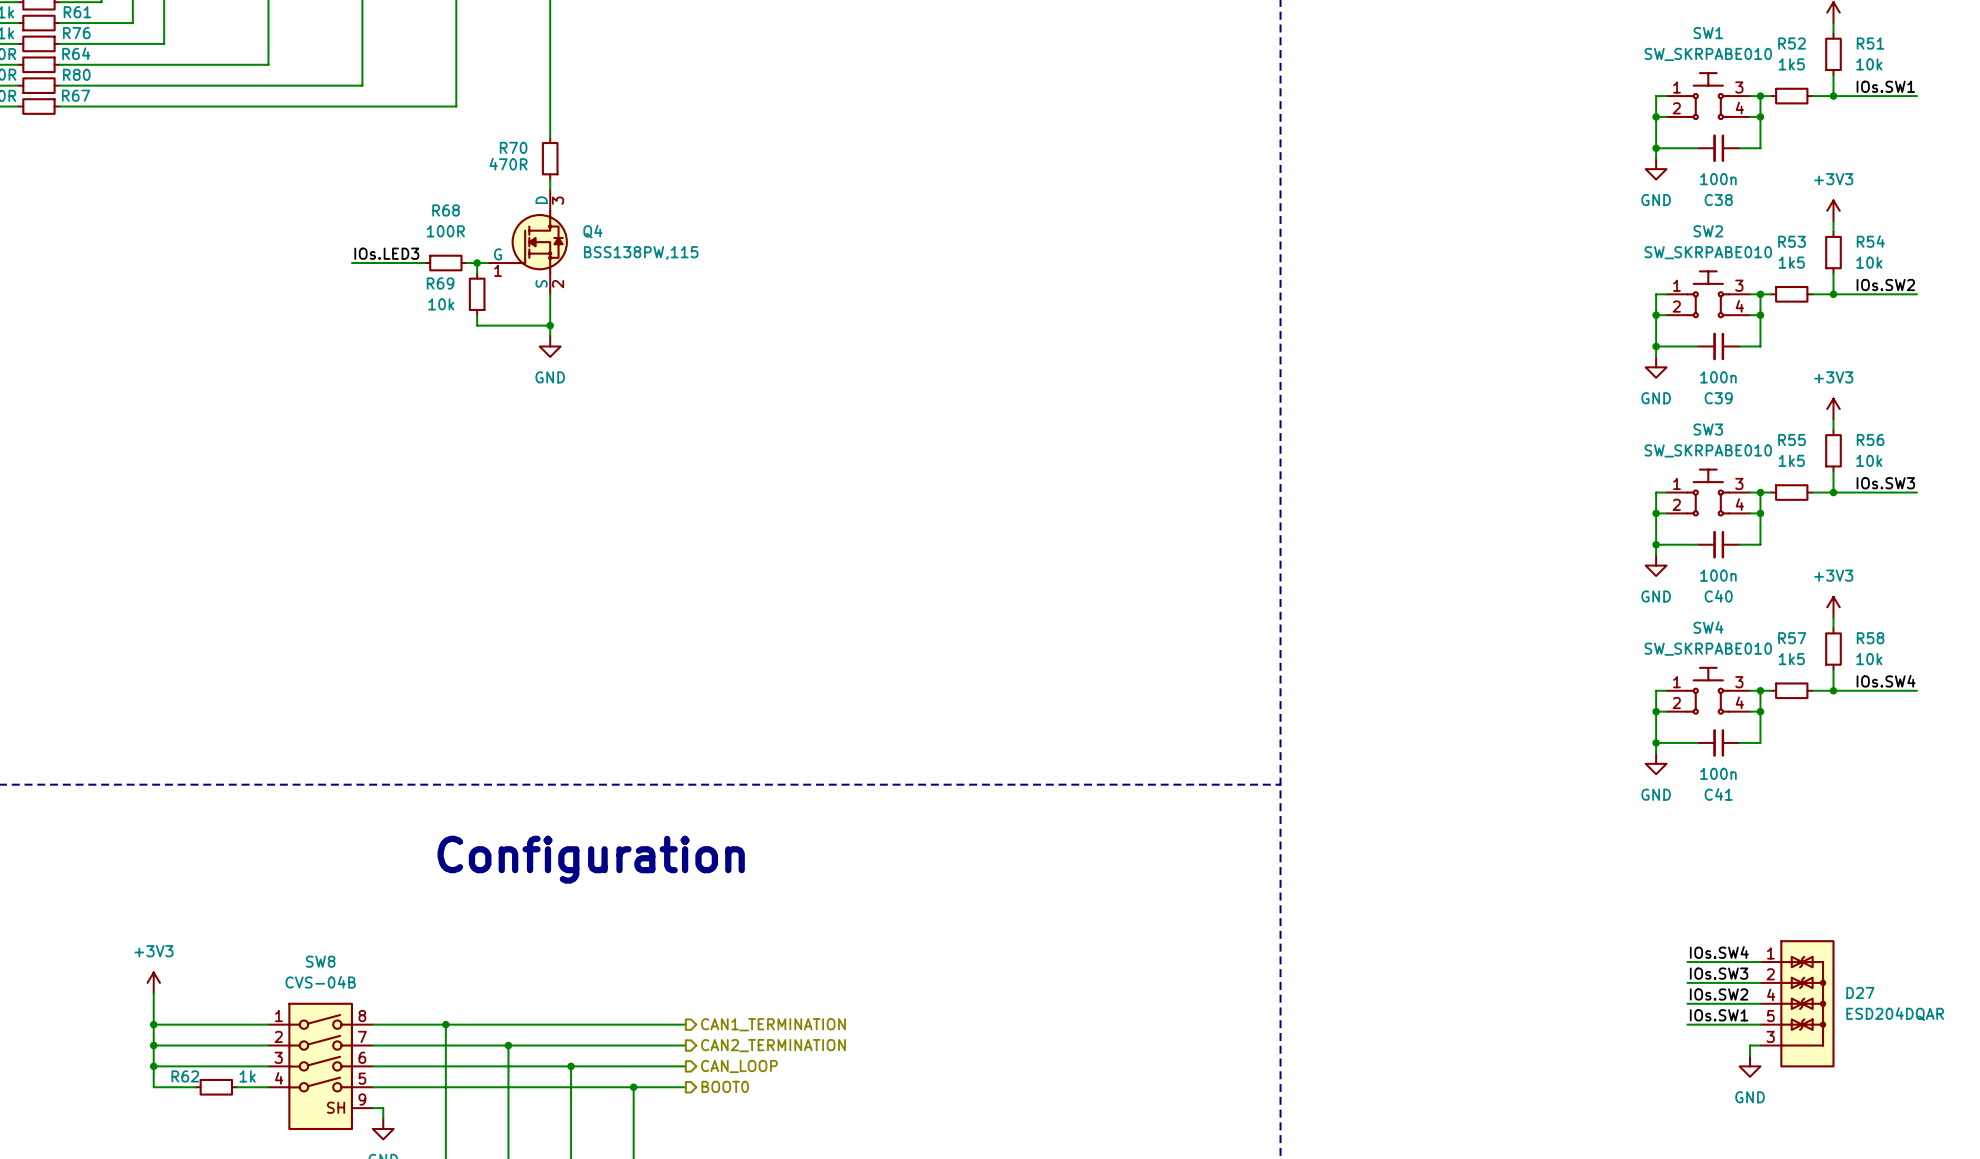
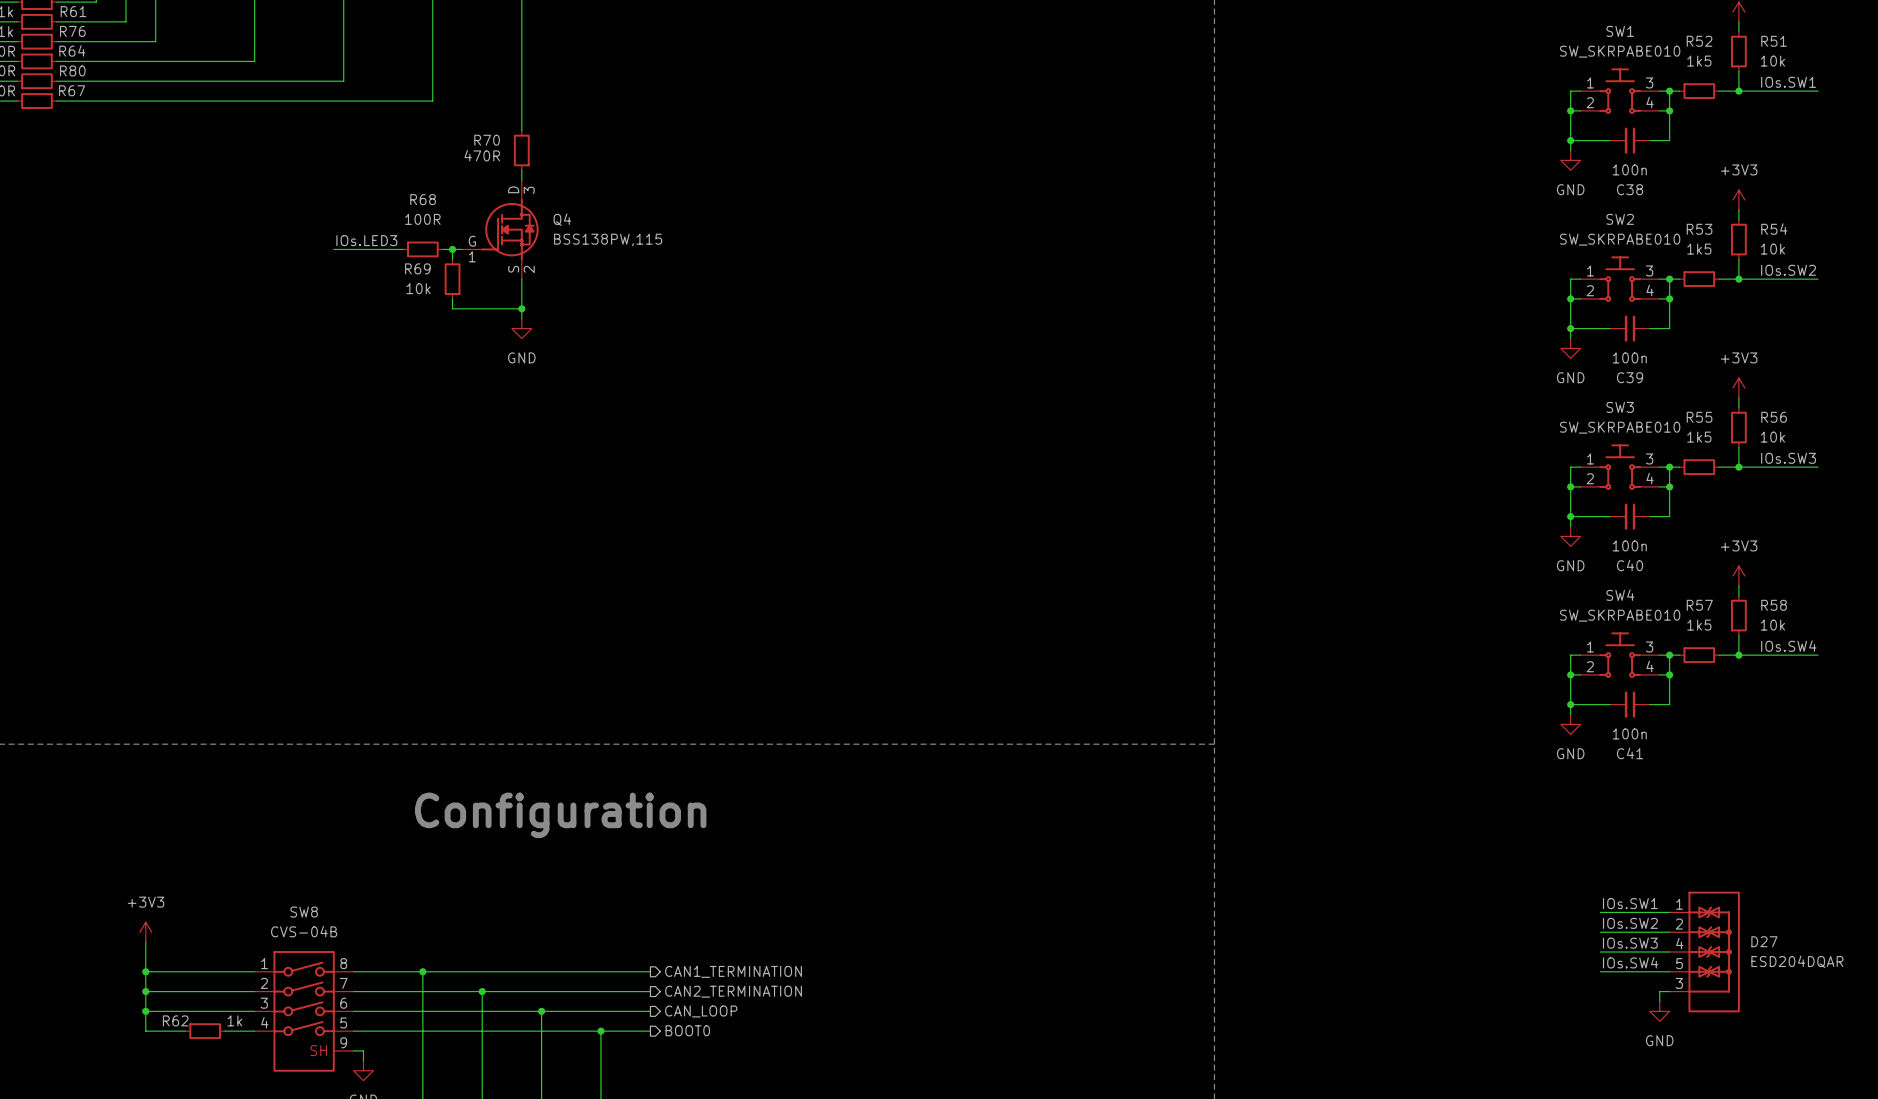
label: IOs.SW4 (1719, 952) -> IOs.SW1 (1630, 903)
label: IOs.SW3 (1719, 973) -> IOs.SW2 (1630, 923)
label: IOs.SW2 (1719, 994) -> IOs.SW3 (1630, 943)
label: IOs.SW1 (1719, 1015) -> IOs.SW4 (1630, 962)

